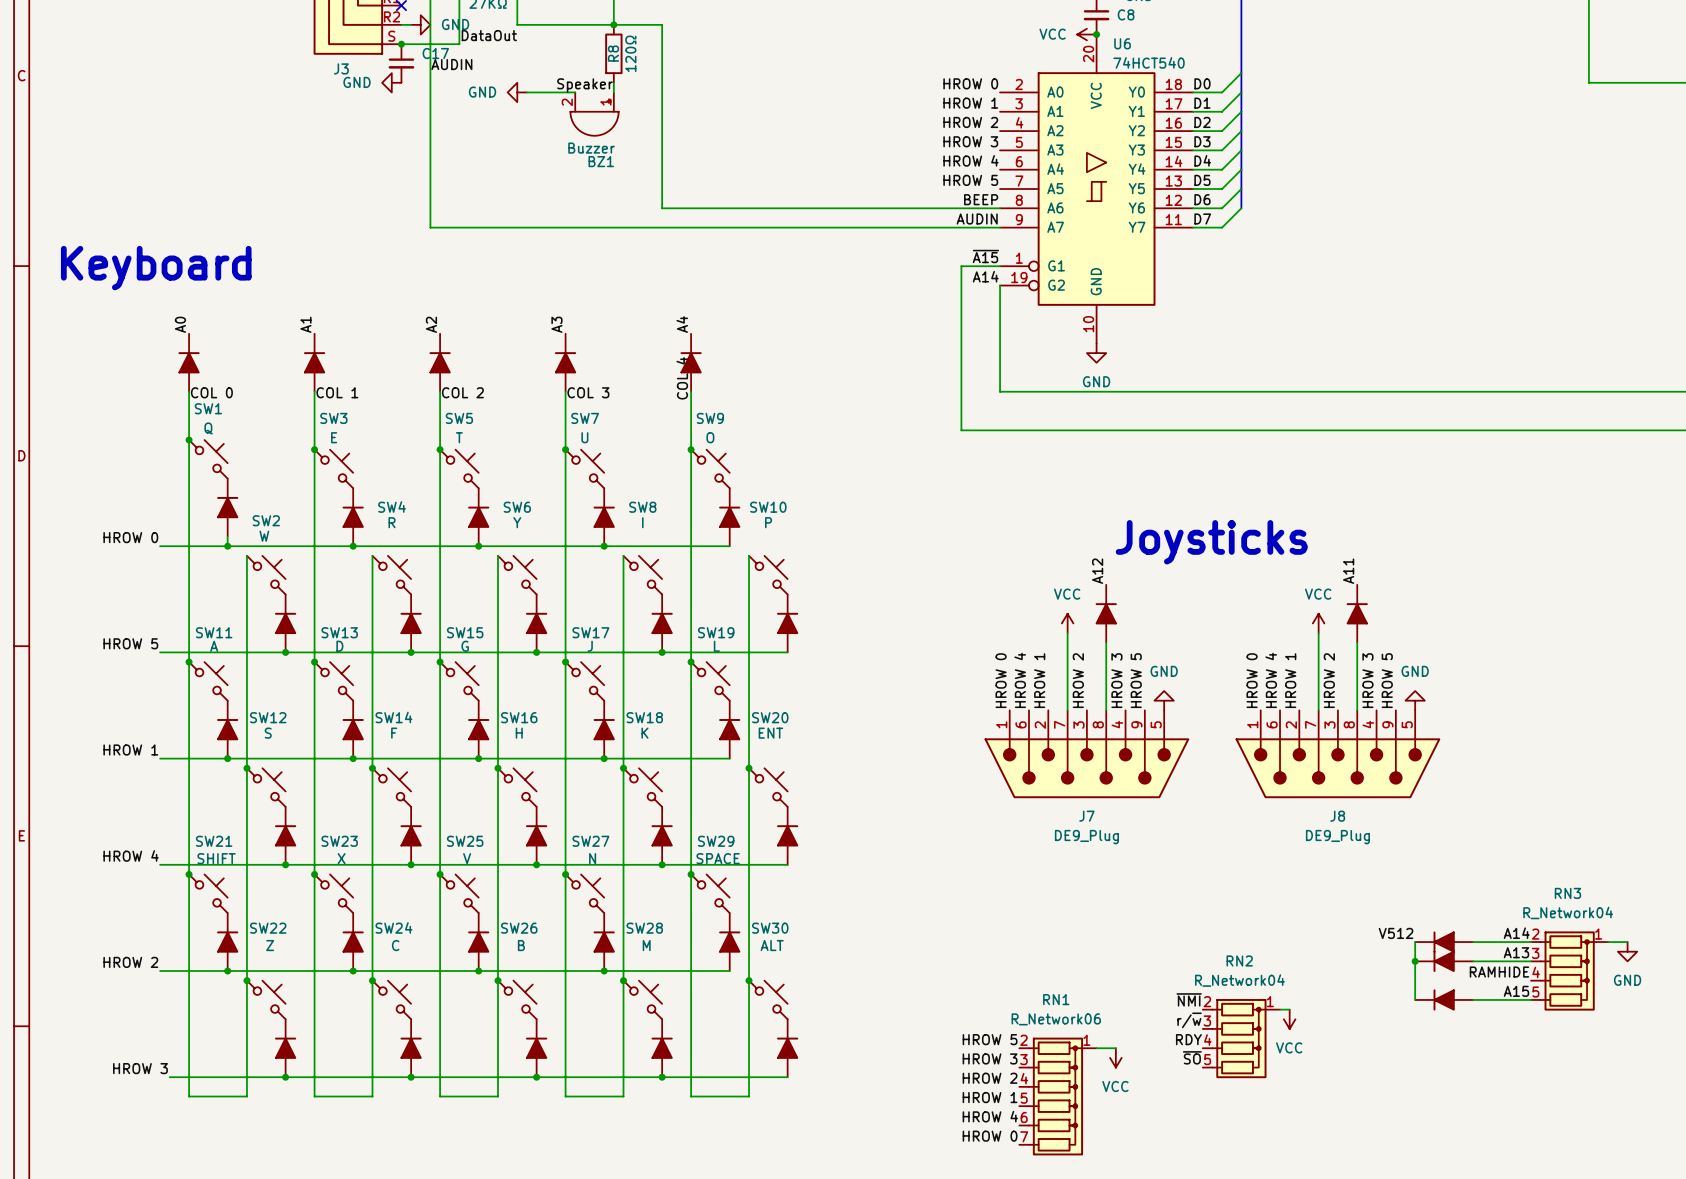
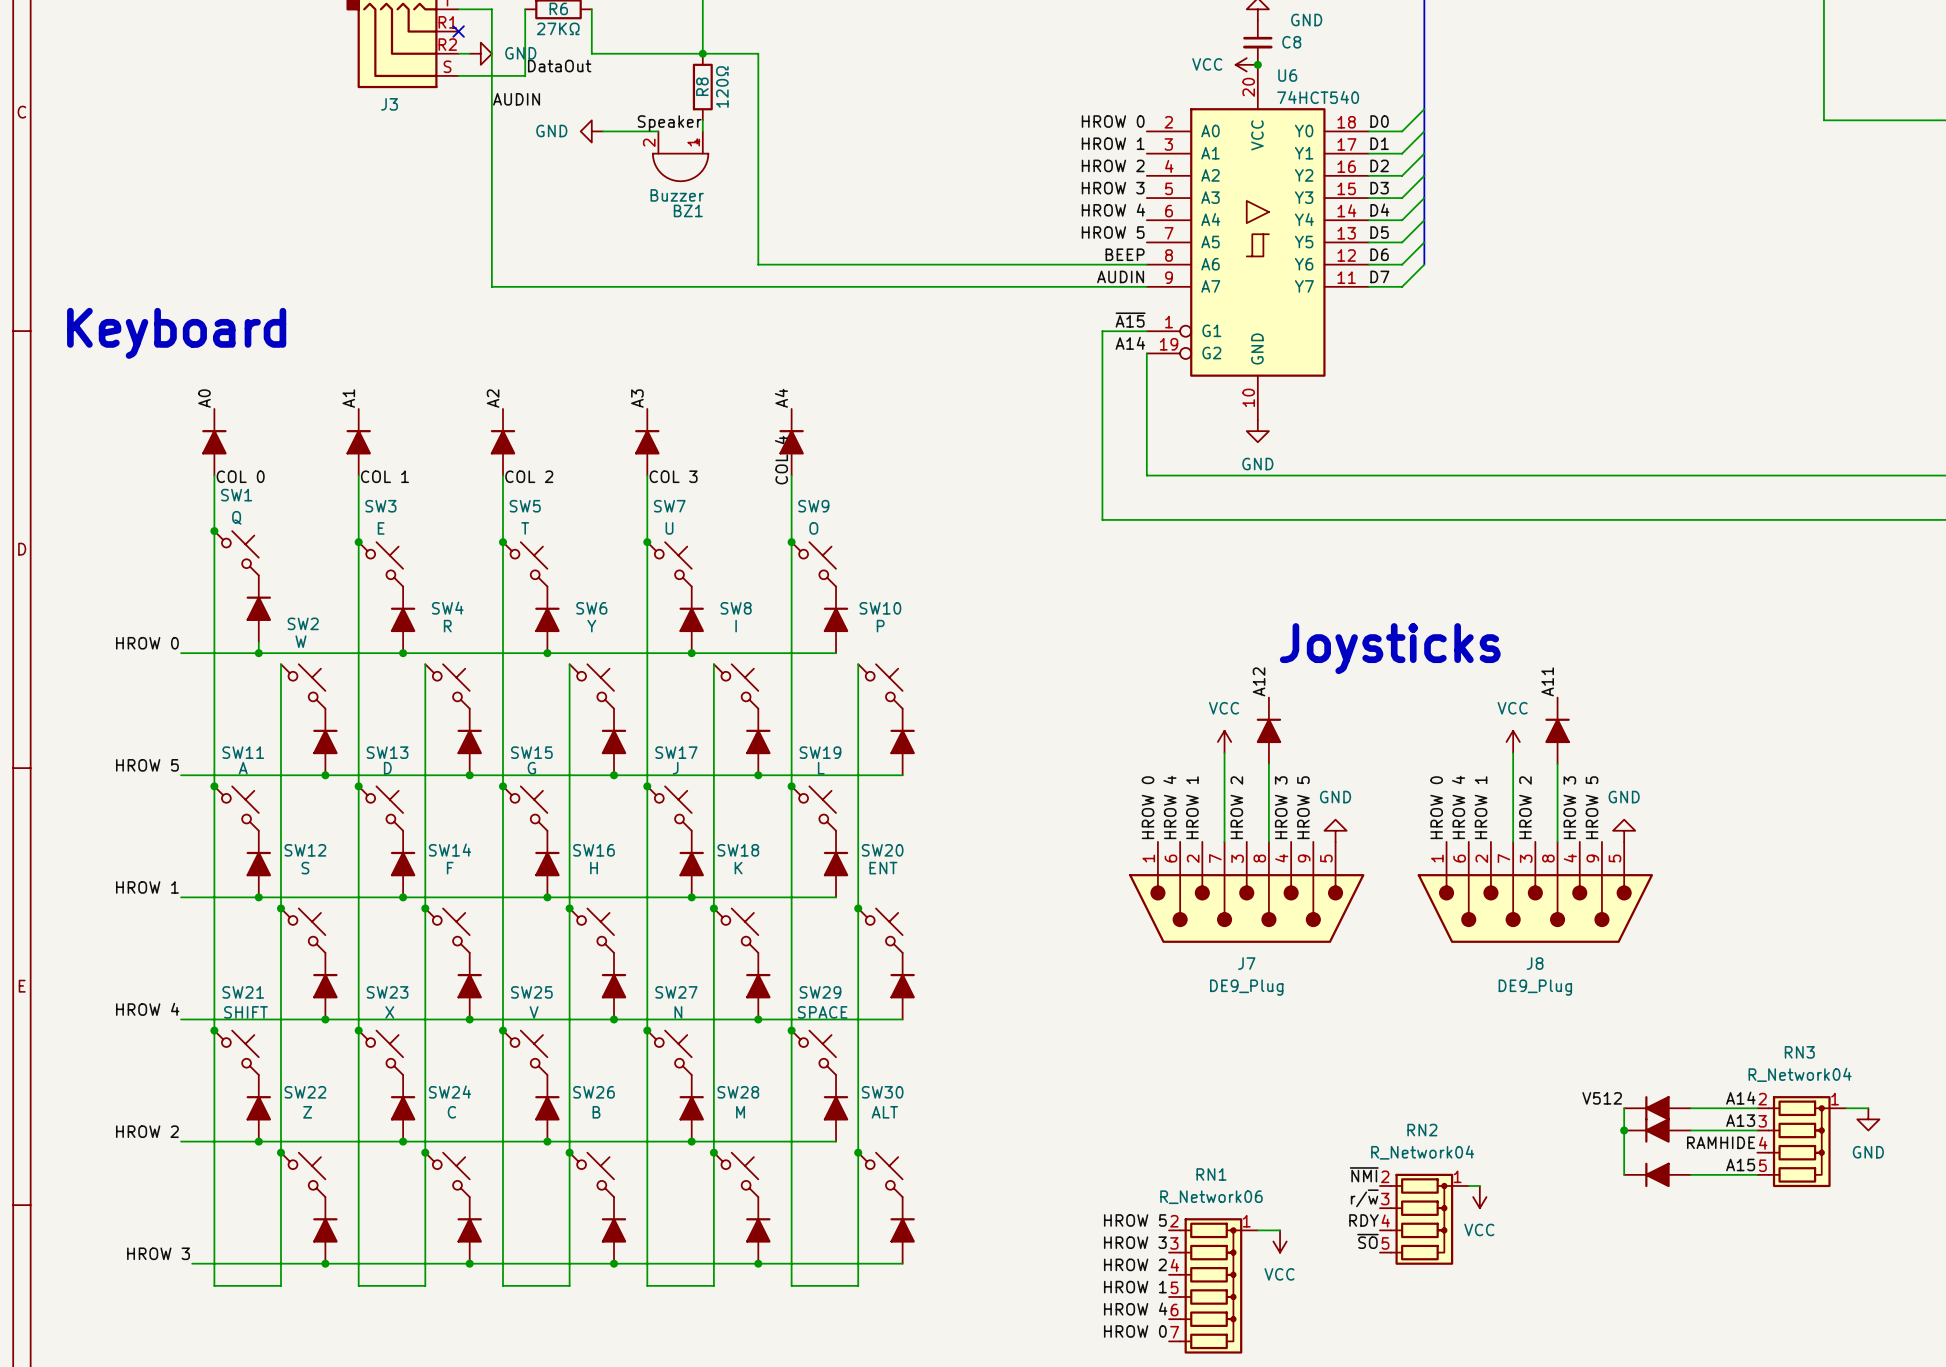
junction: (401, 44) -> none
C17: (401, 63) -> none
power symbol: GND (391, 82) -> none

